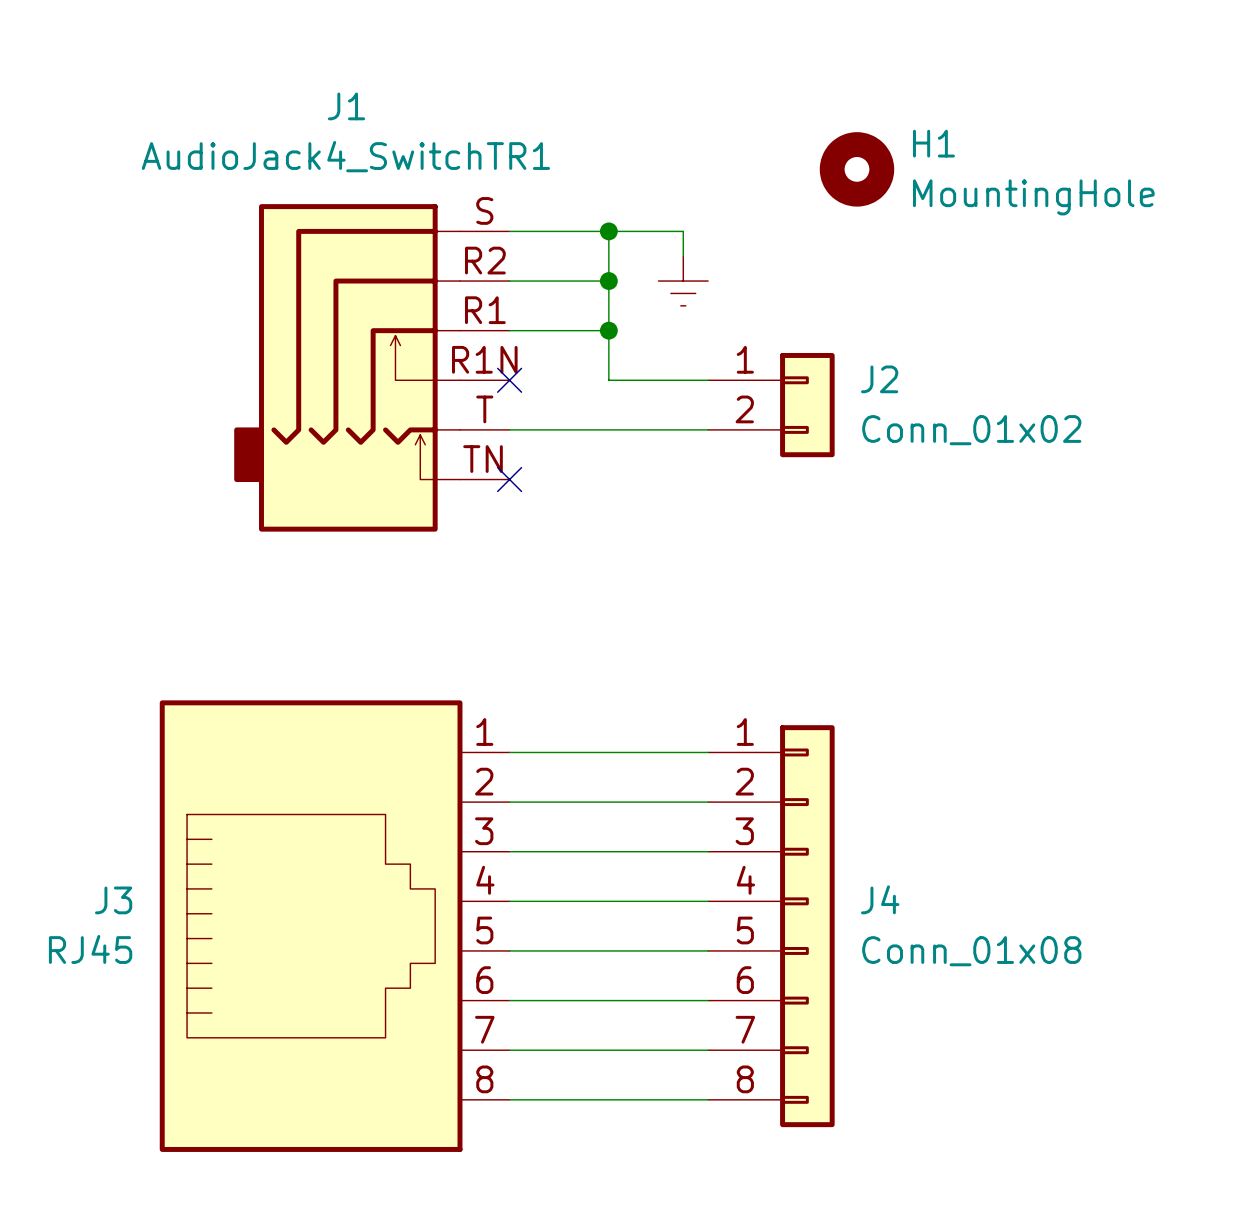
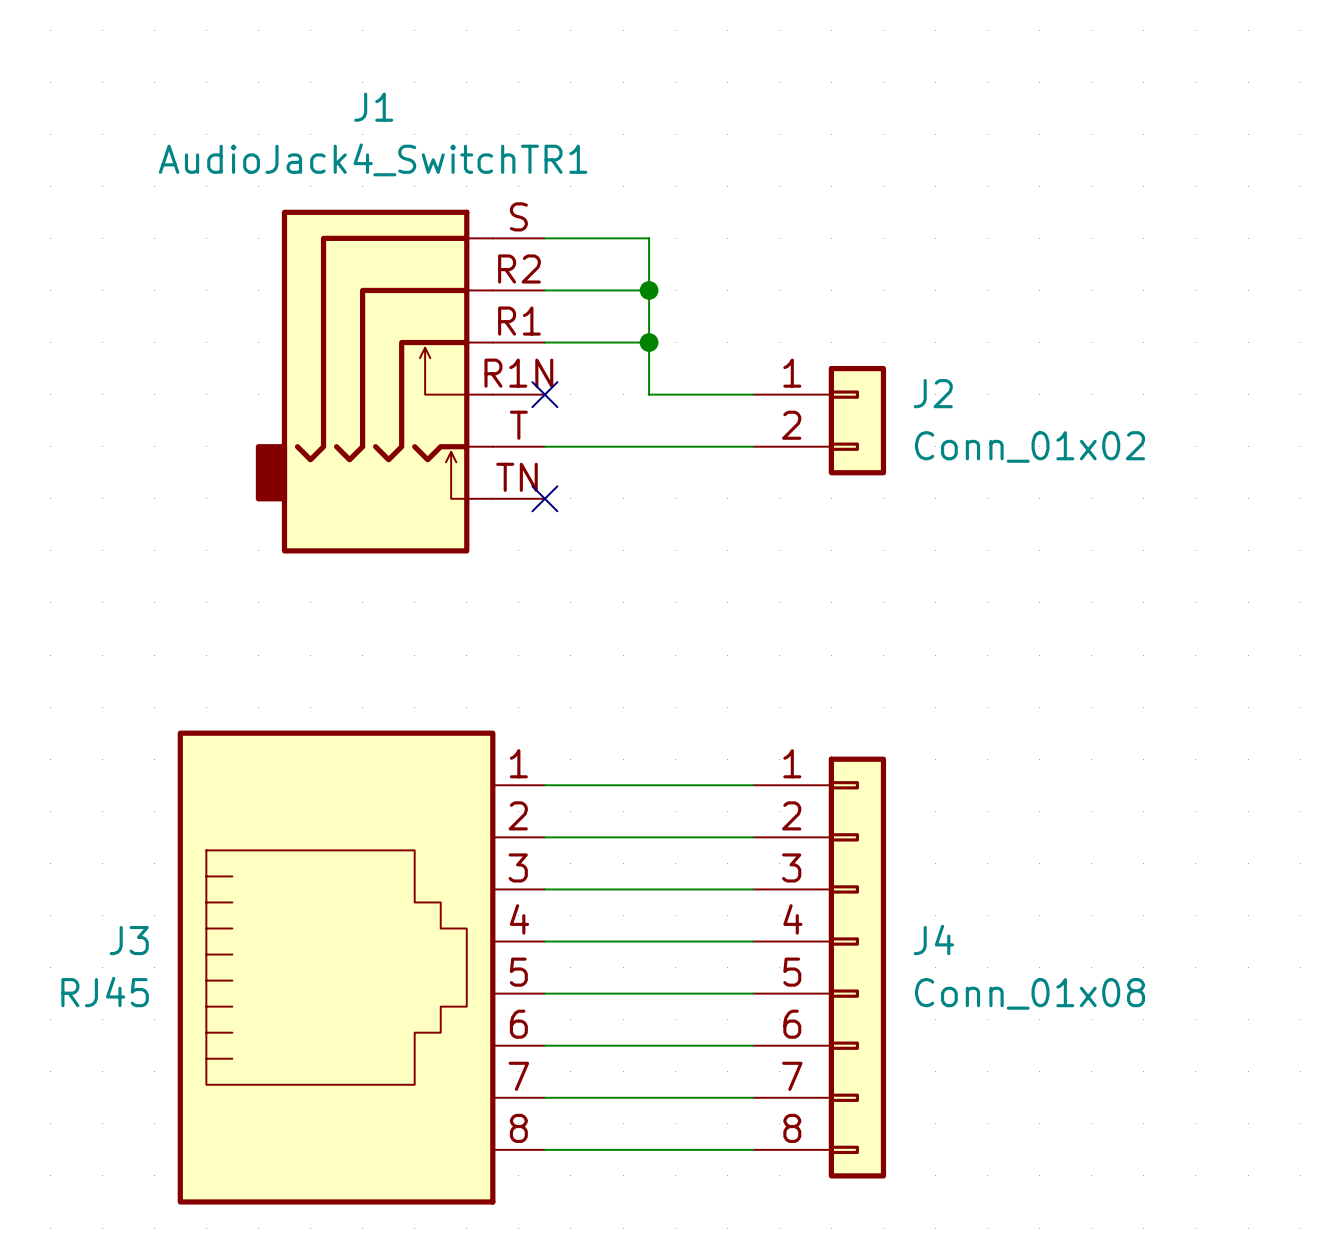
H1: MountingHole (856, 169) -> none
wire: (608, 231) (683, 231) (683, 256) -> none
junction: (608, 231) -> none
power symbol: (683, 281) -> none

